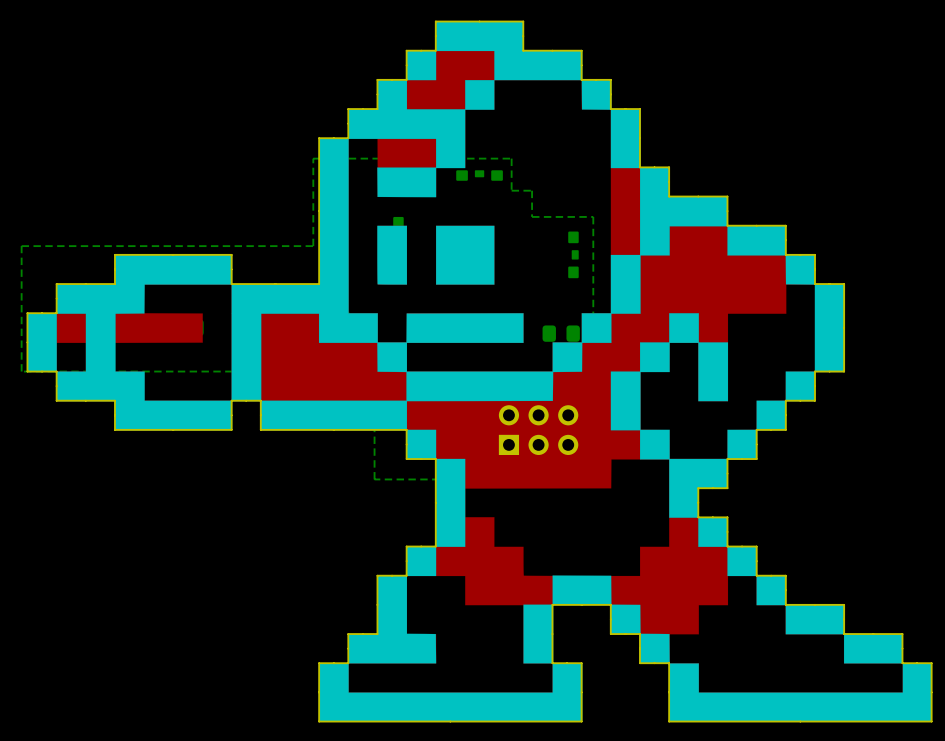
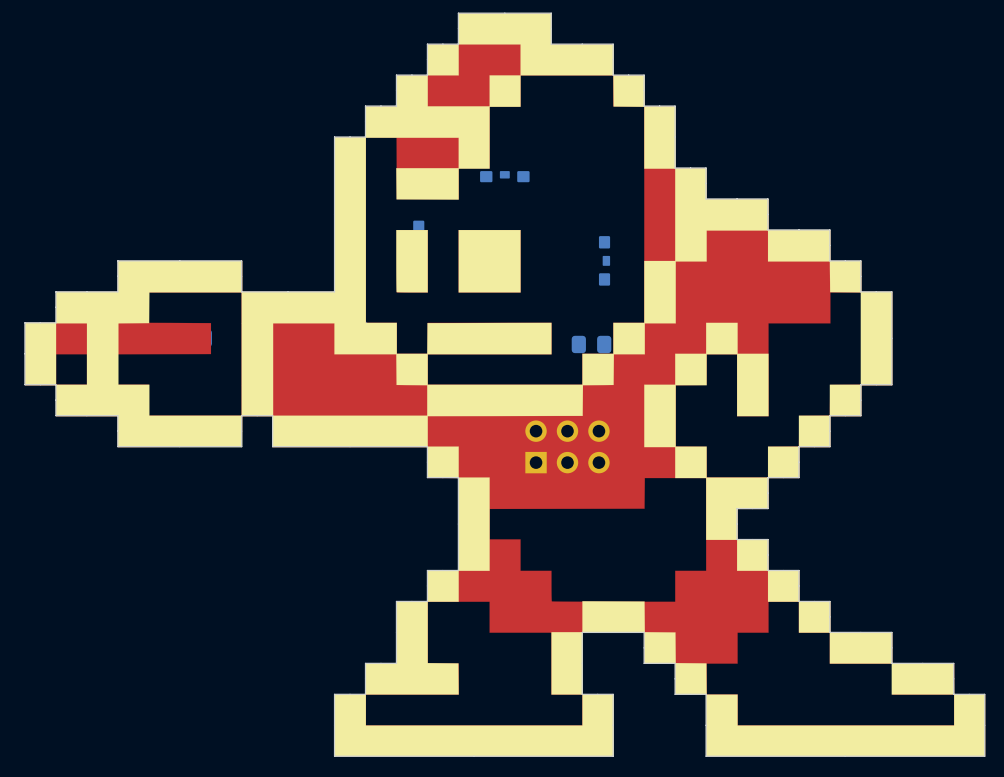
bottom zone outline: (313, 158) (313, 246) (21, 246) (21, 371) (374, 371) (374, 479) (593, 479) (593, 216) (532, 216) (532, 190) (511, 190) (511, 158) (313, 158) -> none

